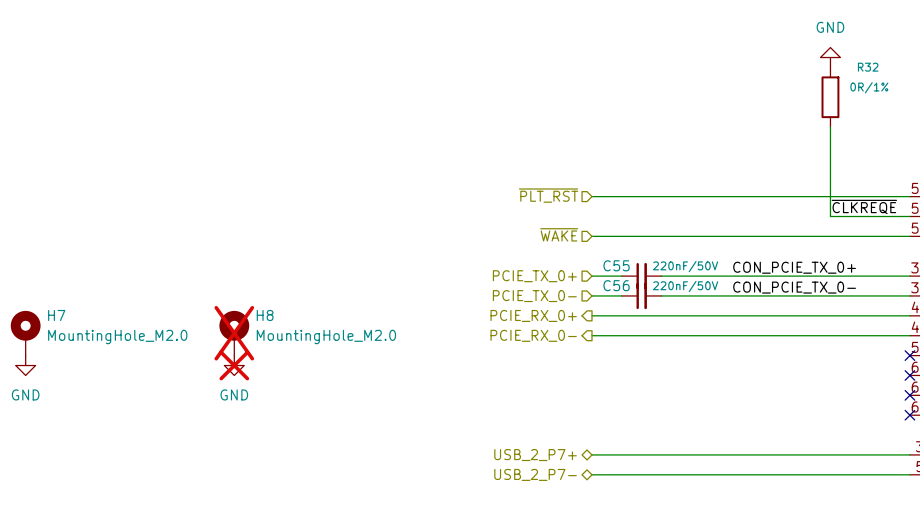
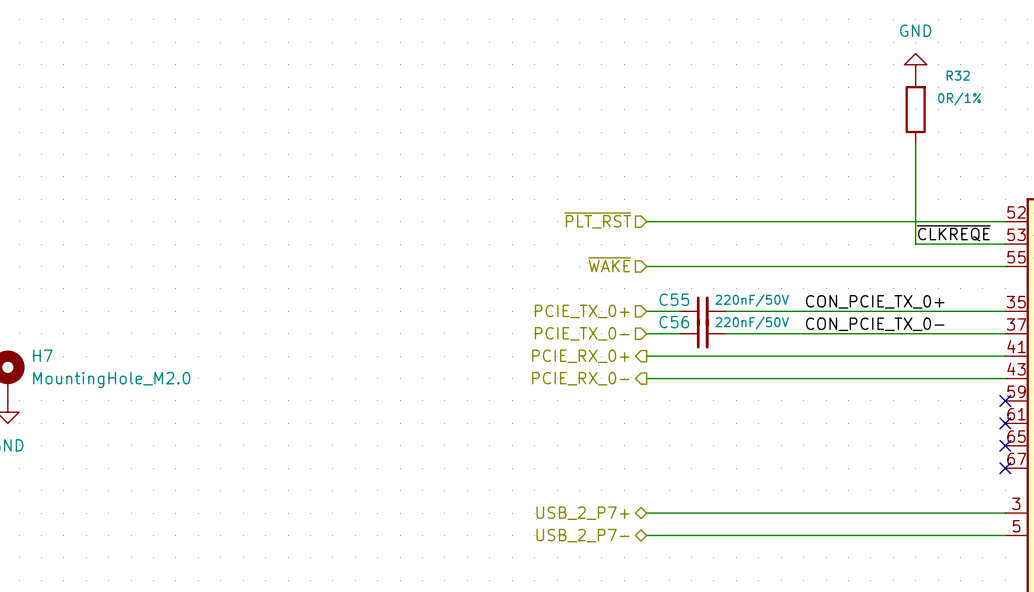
H8: MountingHole_M2.0 (234, 333) -> none
power symbol: GND (234, 365) -> none

